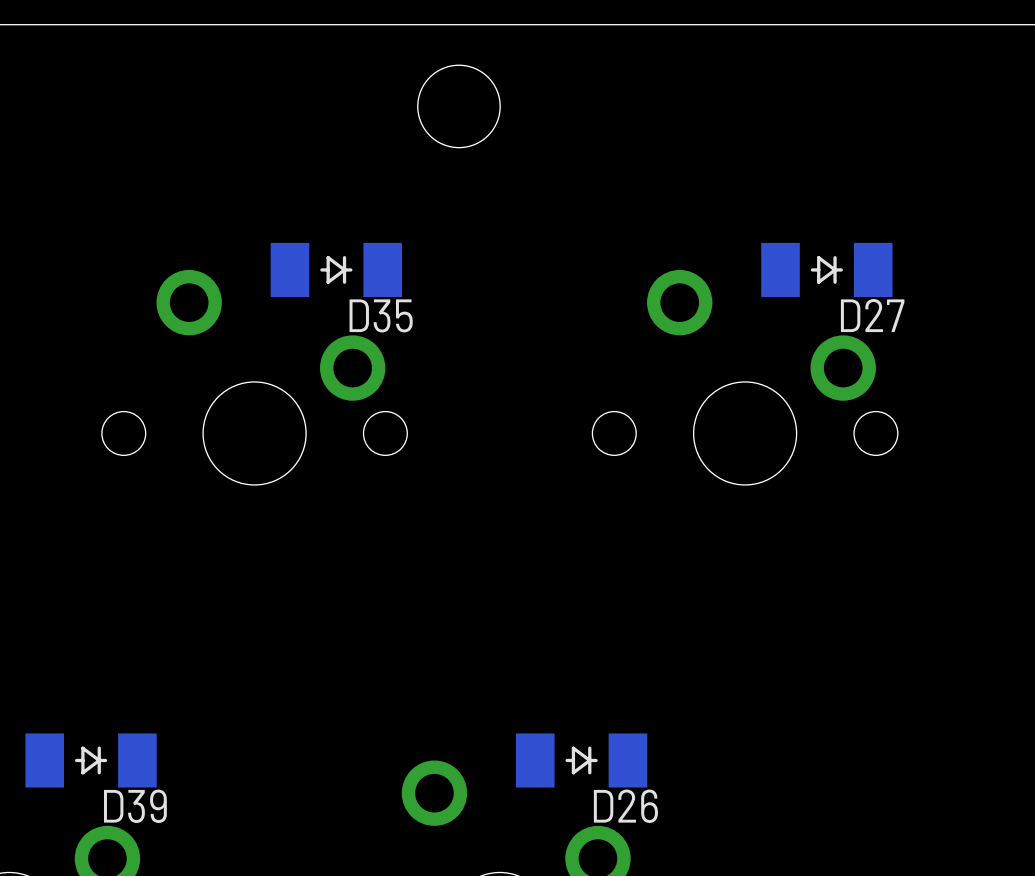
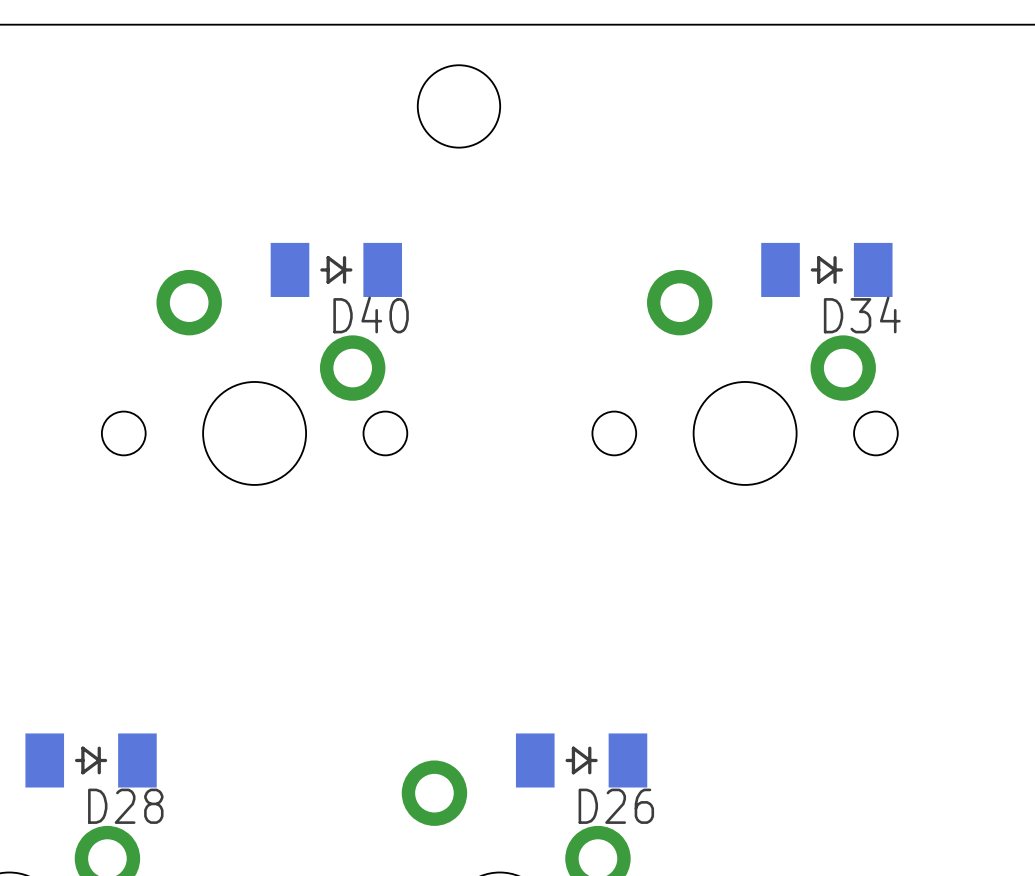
D35 name: D35 (381, 315) -> D40 (371, 314)
D27 name: D27 (872, 315) -> D34 (862, 314)
D39 name: D39 (135, 806) -> D28 (125, 806)

